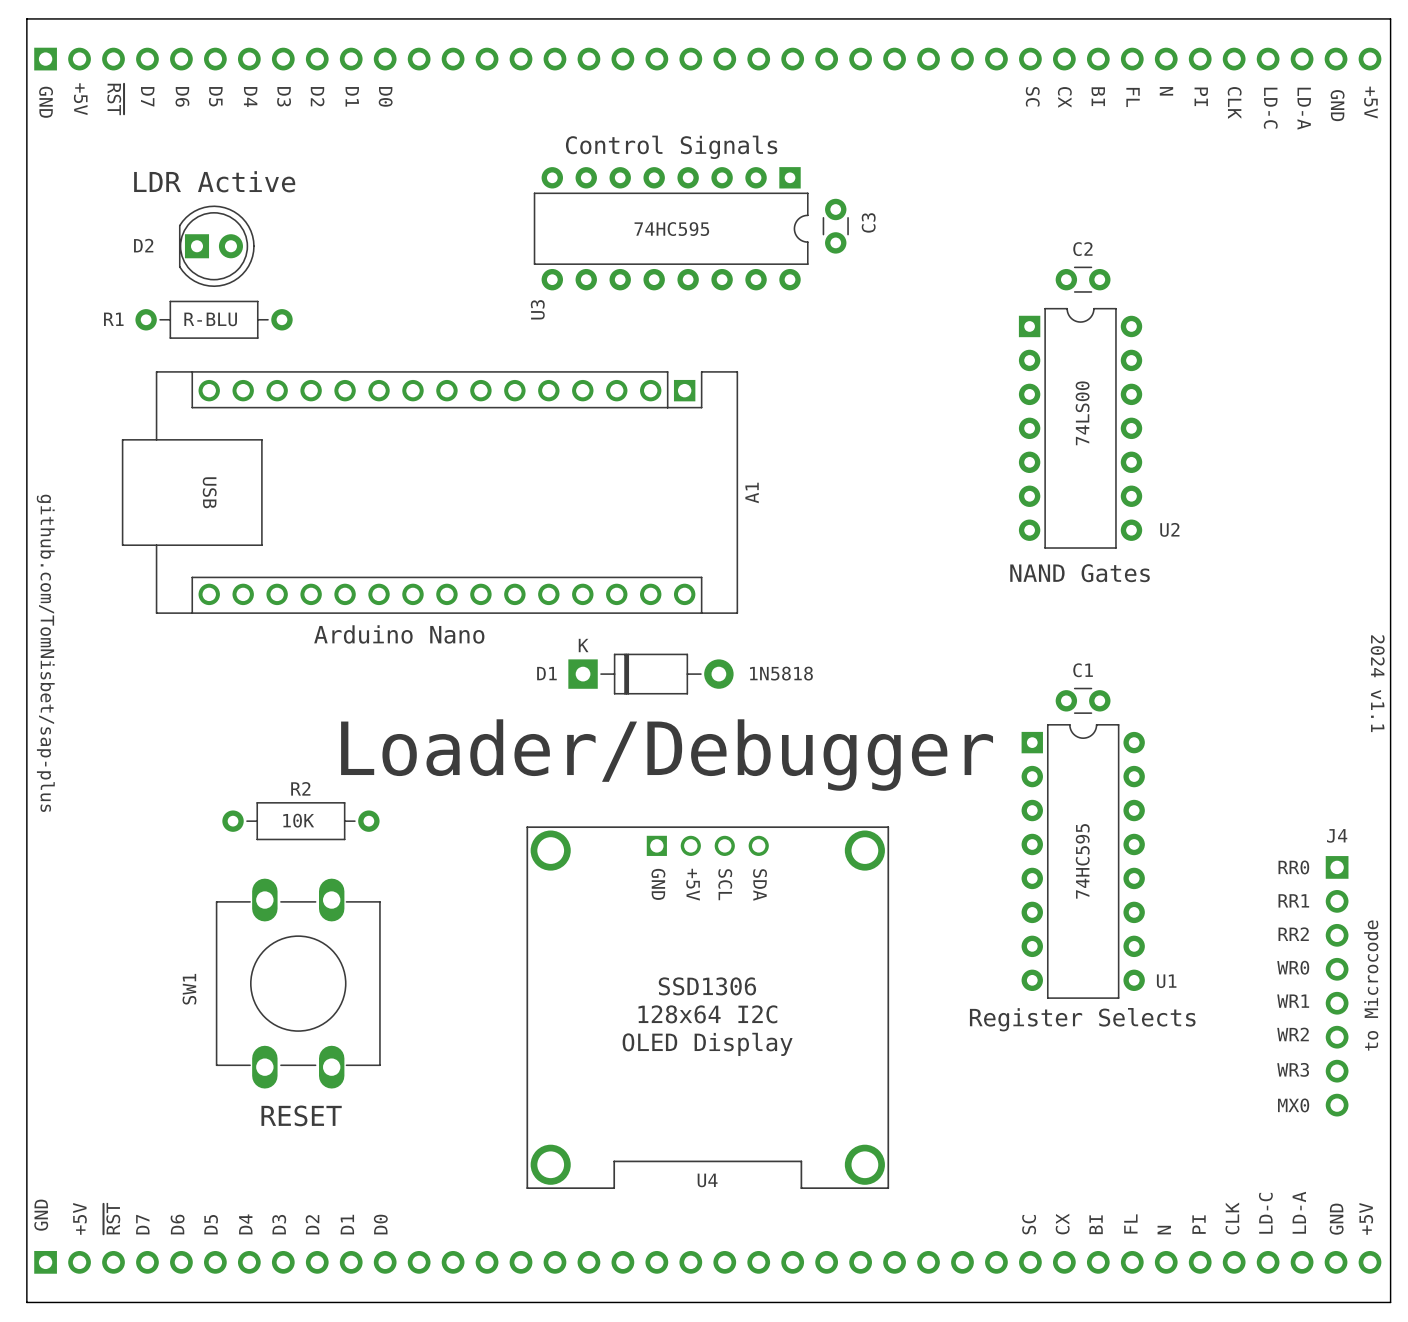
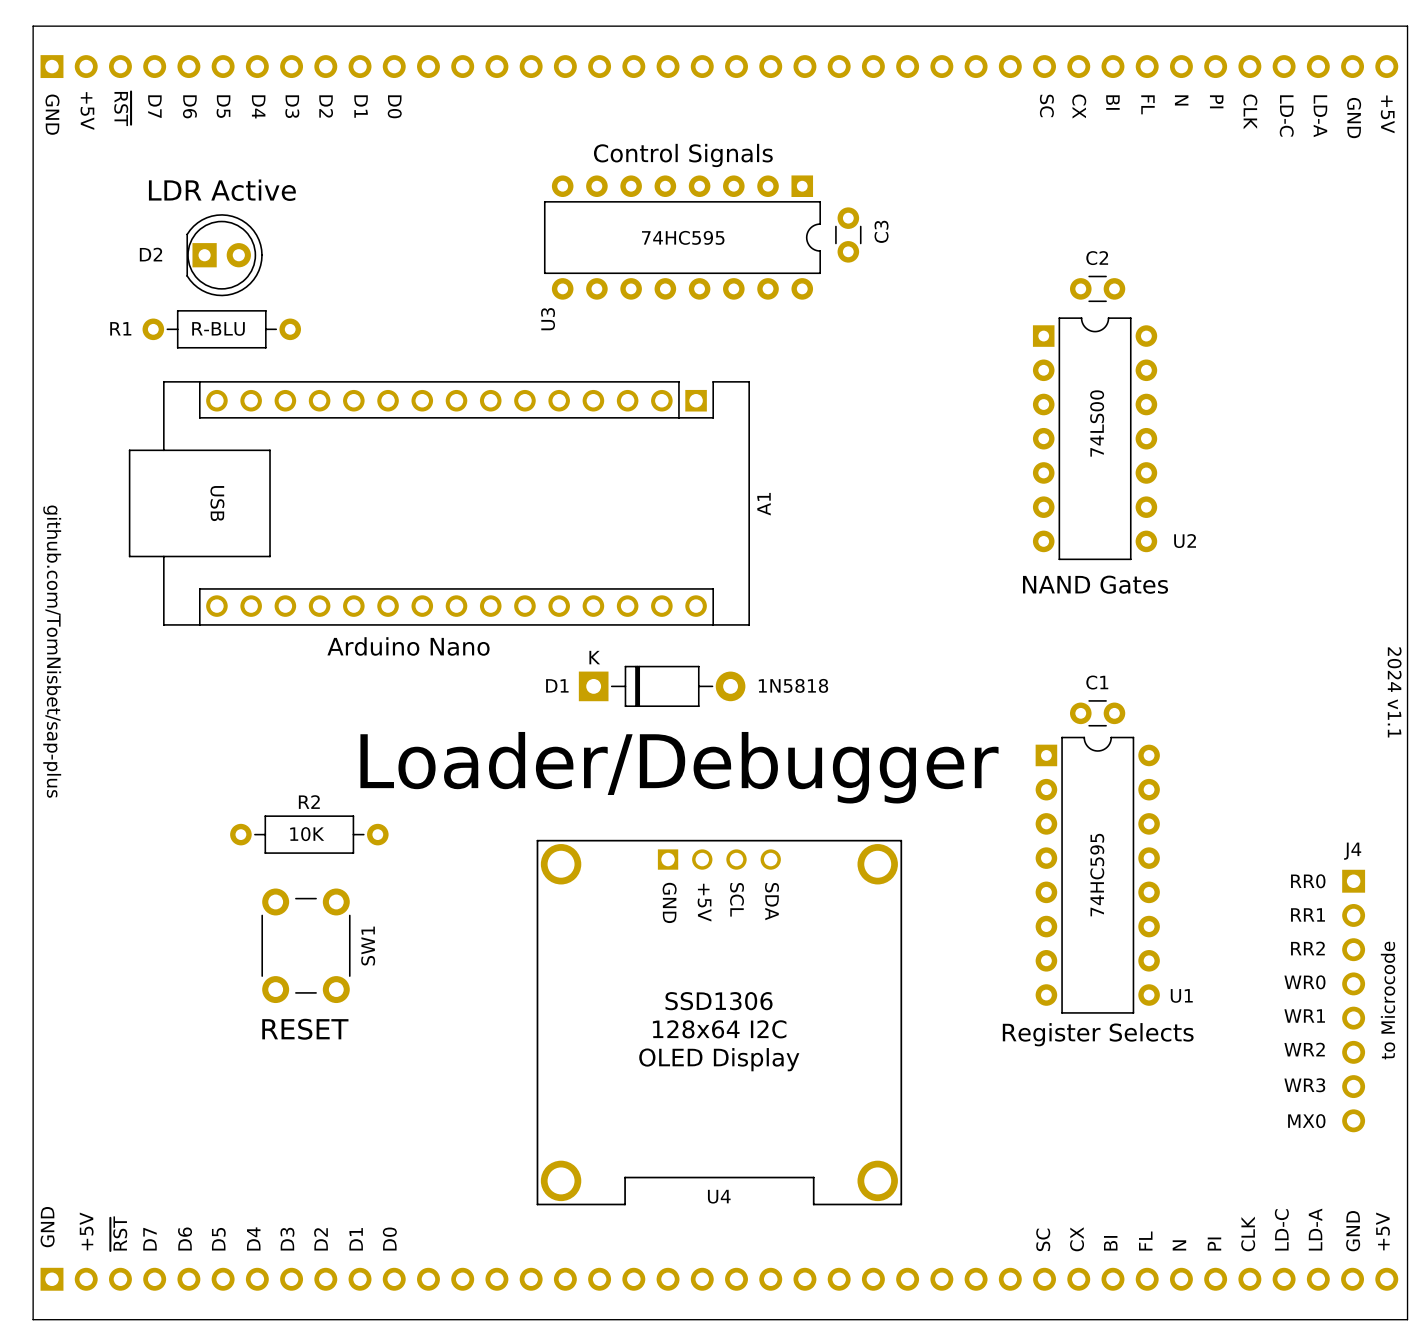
SW1 footprint: [215, 878, 381, 1089] -> [261, 888, 351, 1004]
SW1 name position: SW1 (189, 989) -> SW1 (368, 946)
SW1 value position: RESET (301, 1115) -> RESET (305, 1029)

